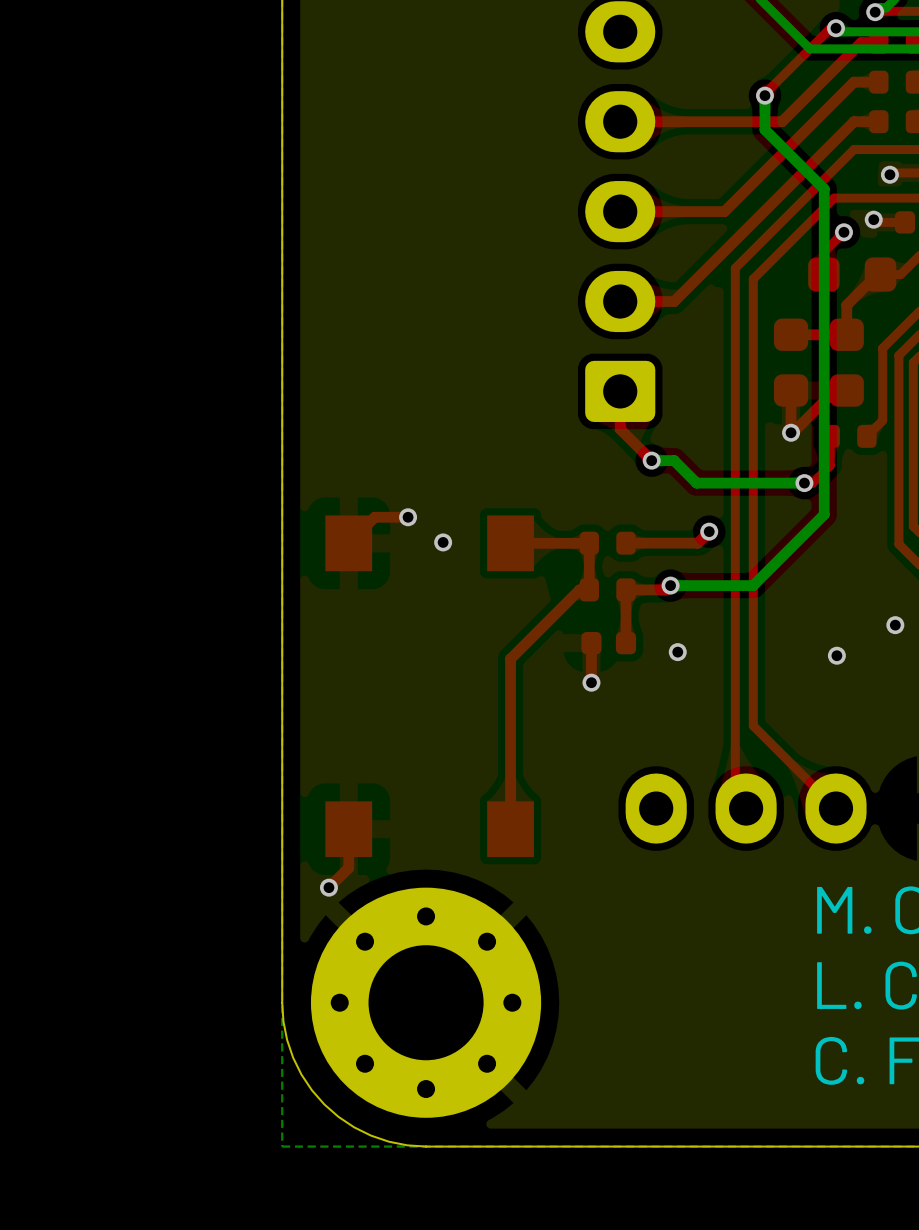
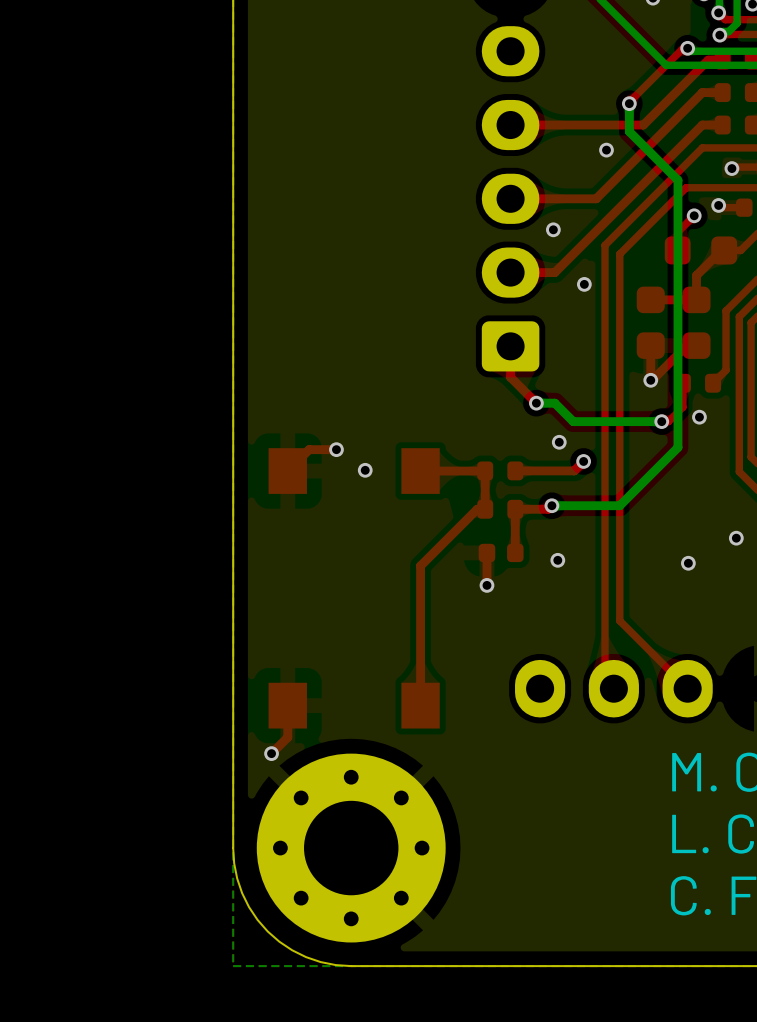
via: none -> (606, 150)
via: none -> (553, 229)
via: none -> (584, 284)
via: none -> (699, 417)
via: none -> (559, 442)

